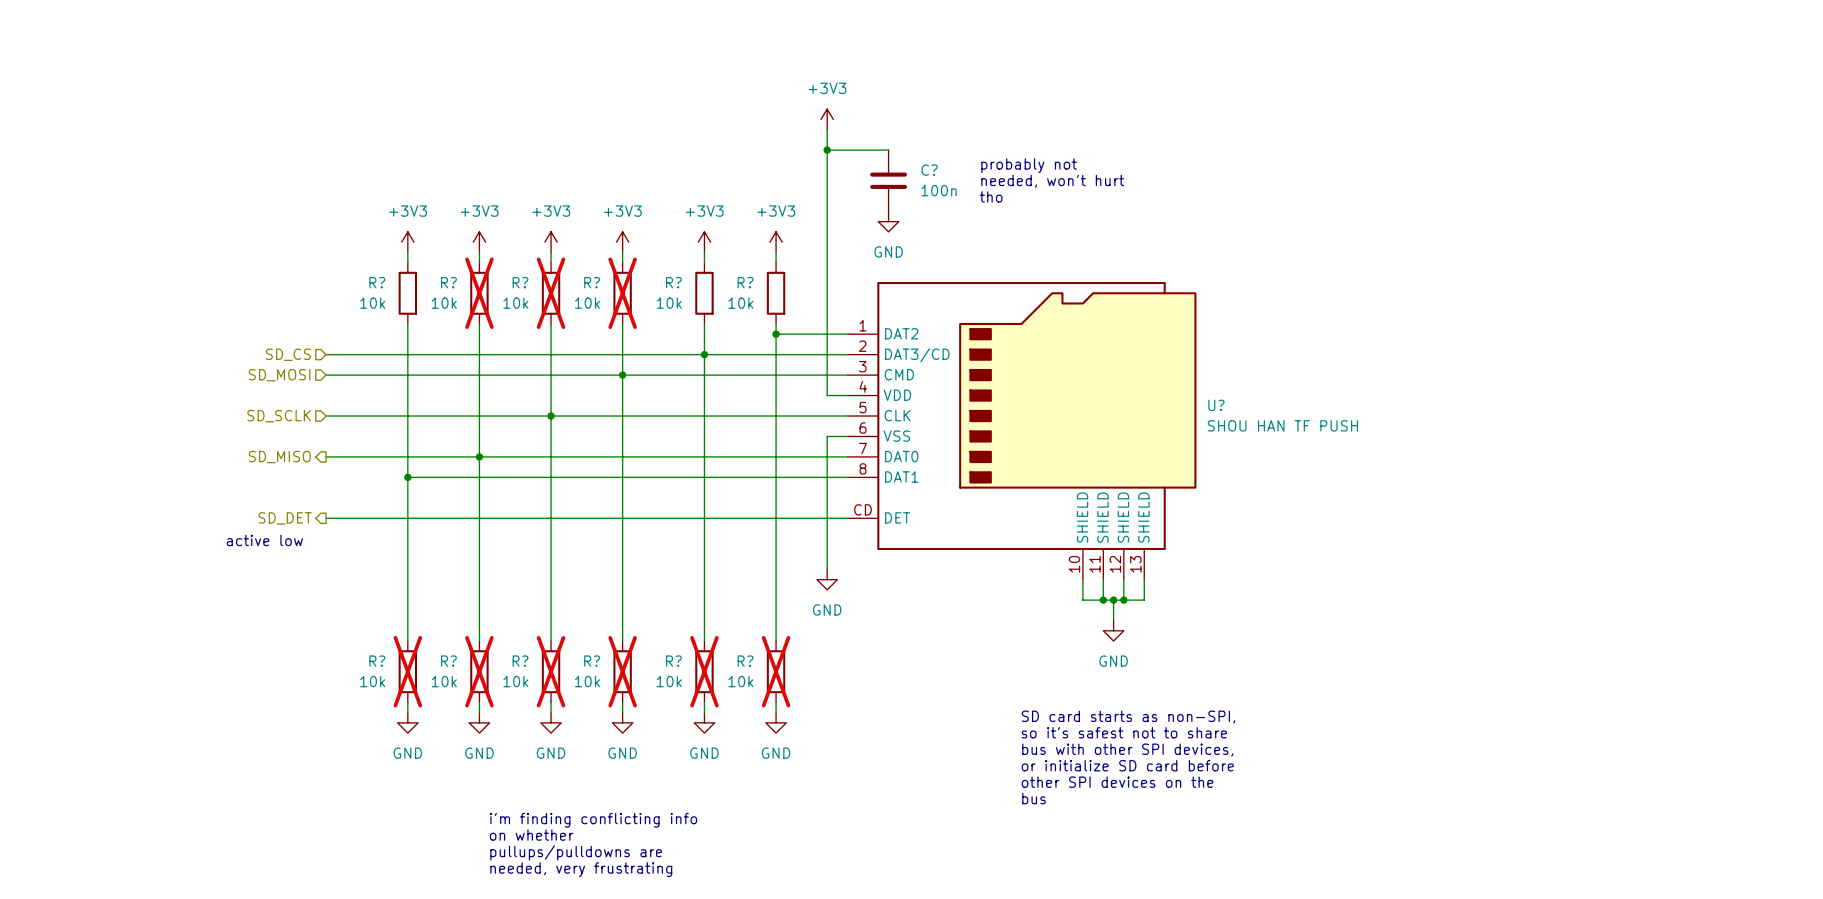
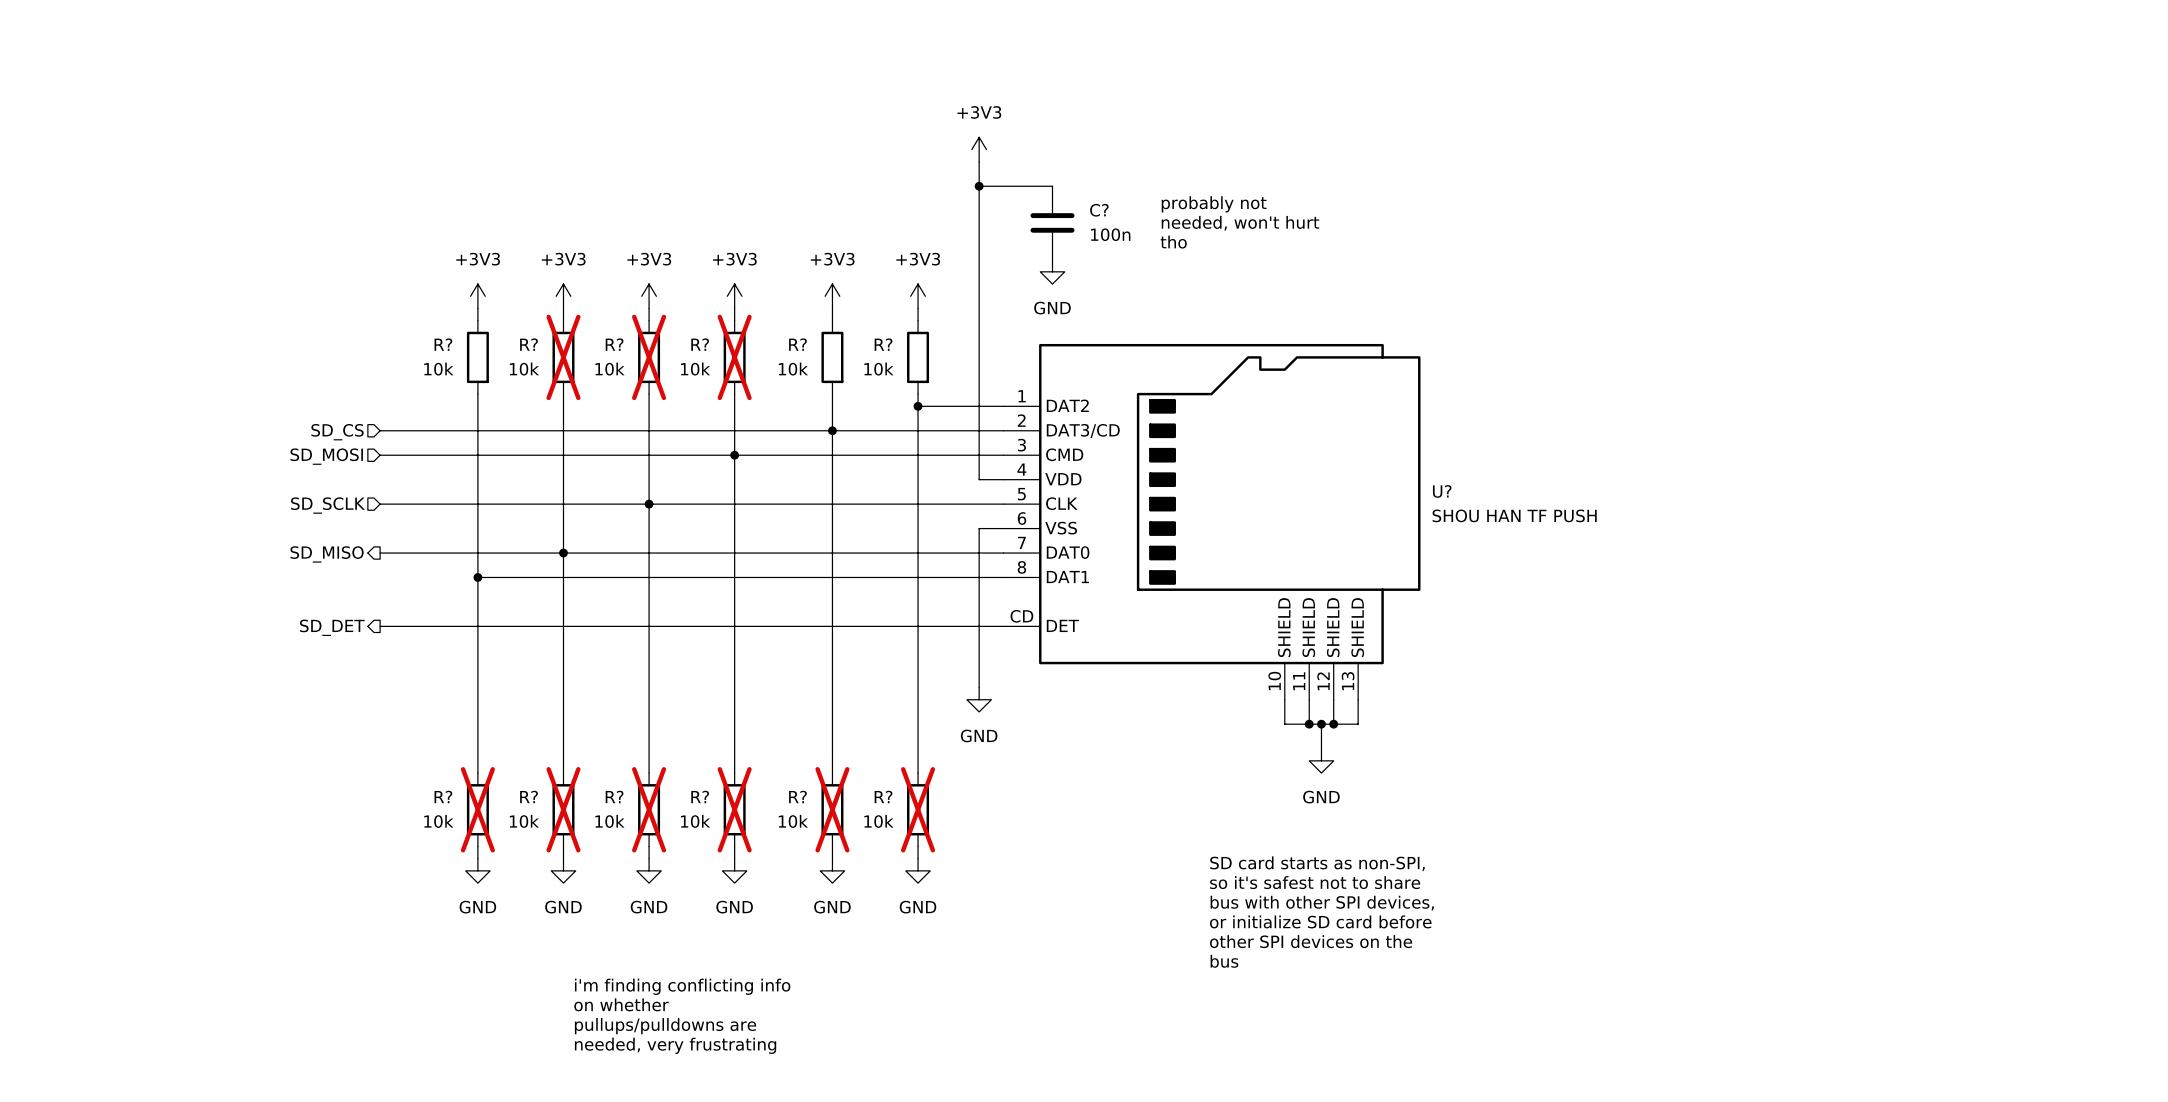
text: active low (264, 540) -> none

